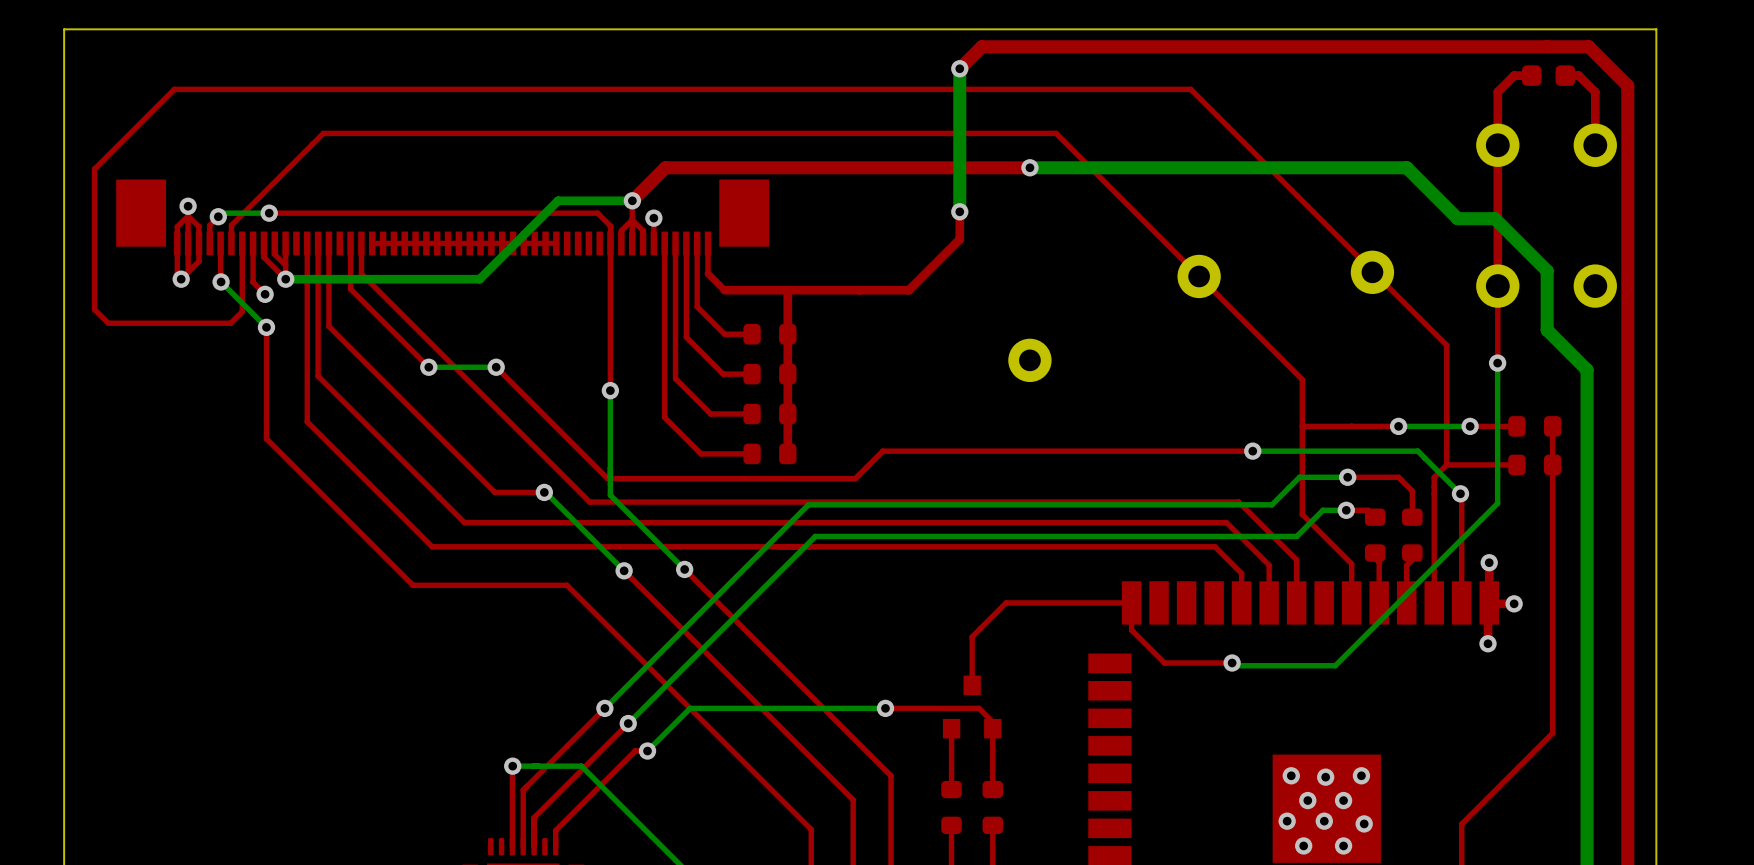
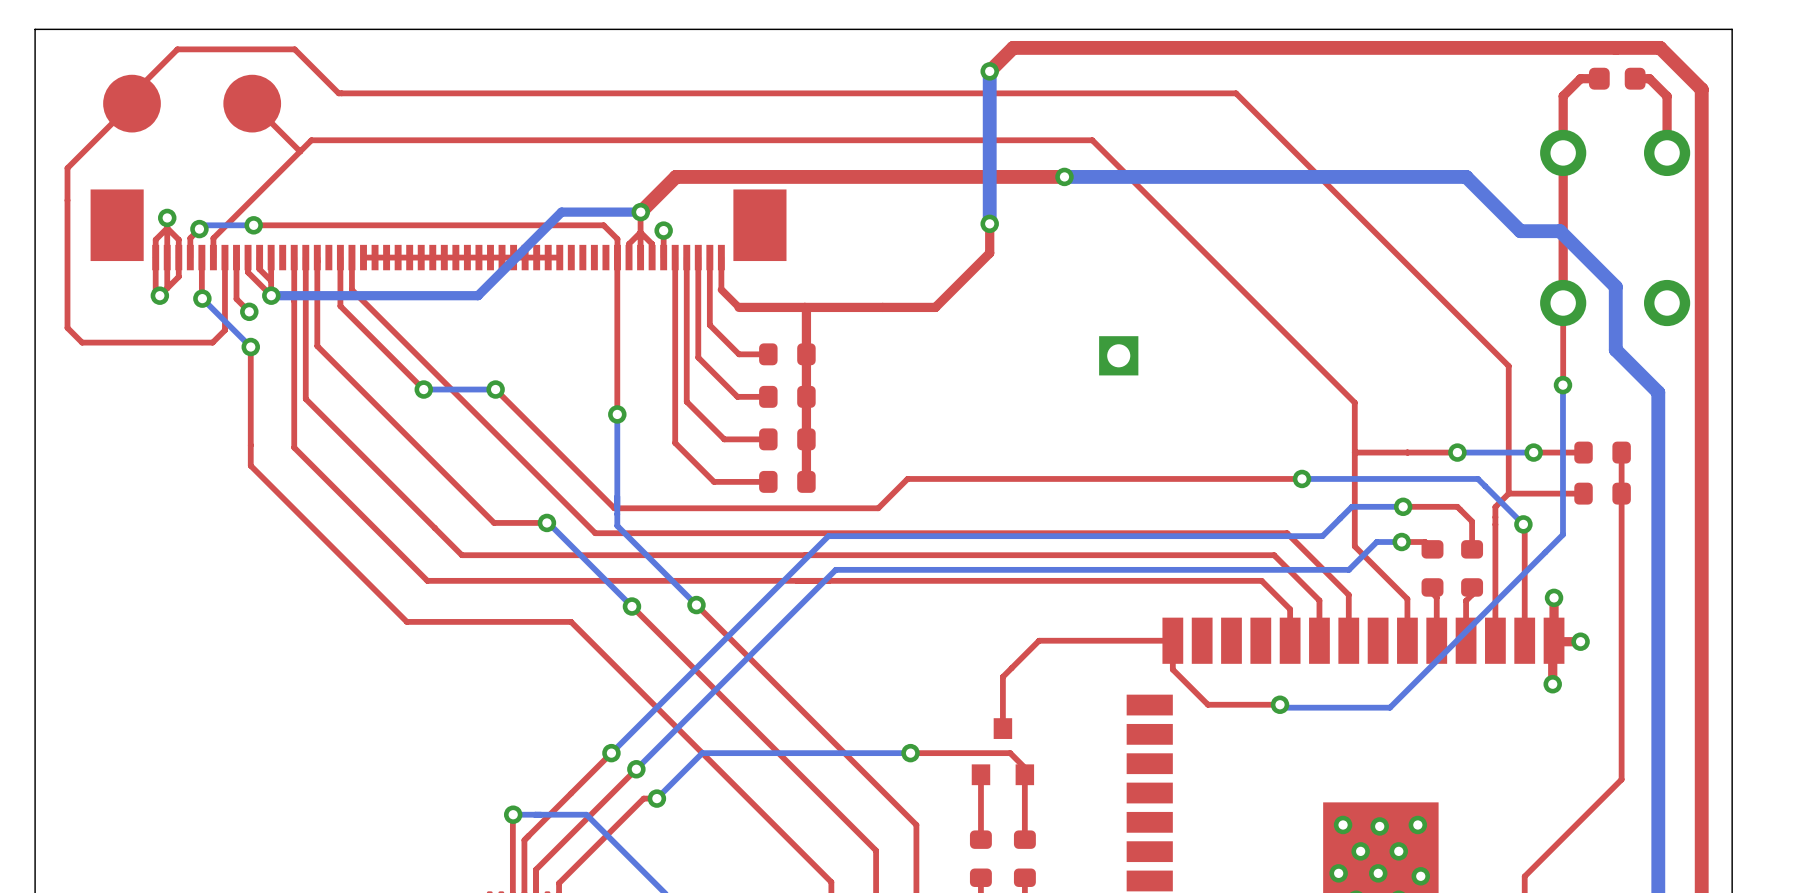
top track: (349, 89) (174, 89) (94, 169) -> (338, 93) (294, 49) (177, 49) (132, 94)
top track: none -> (132, 103) (67, 168) (67, 178)
part: none -> (132, 103)
top track: none -> (252, 103) (300, 151)
part: none -> (252, 103)
part: (1372, 272) -> none
part: (1199, 276) -> none
part: none -> (1118, 355)
part: (1029, 360) -> none

